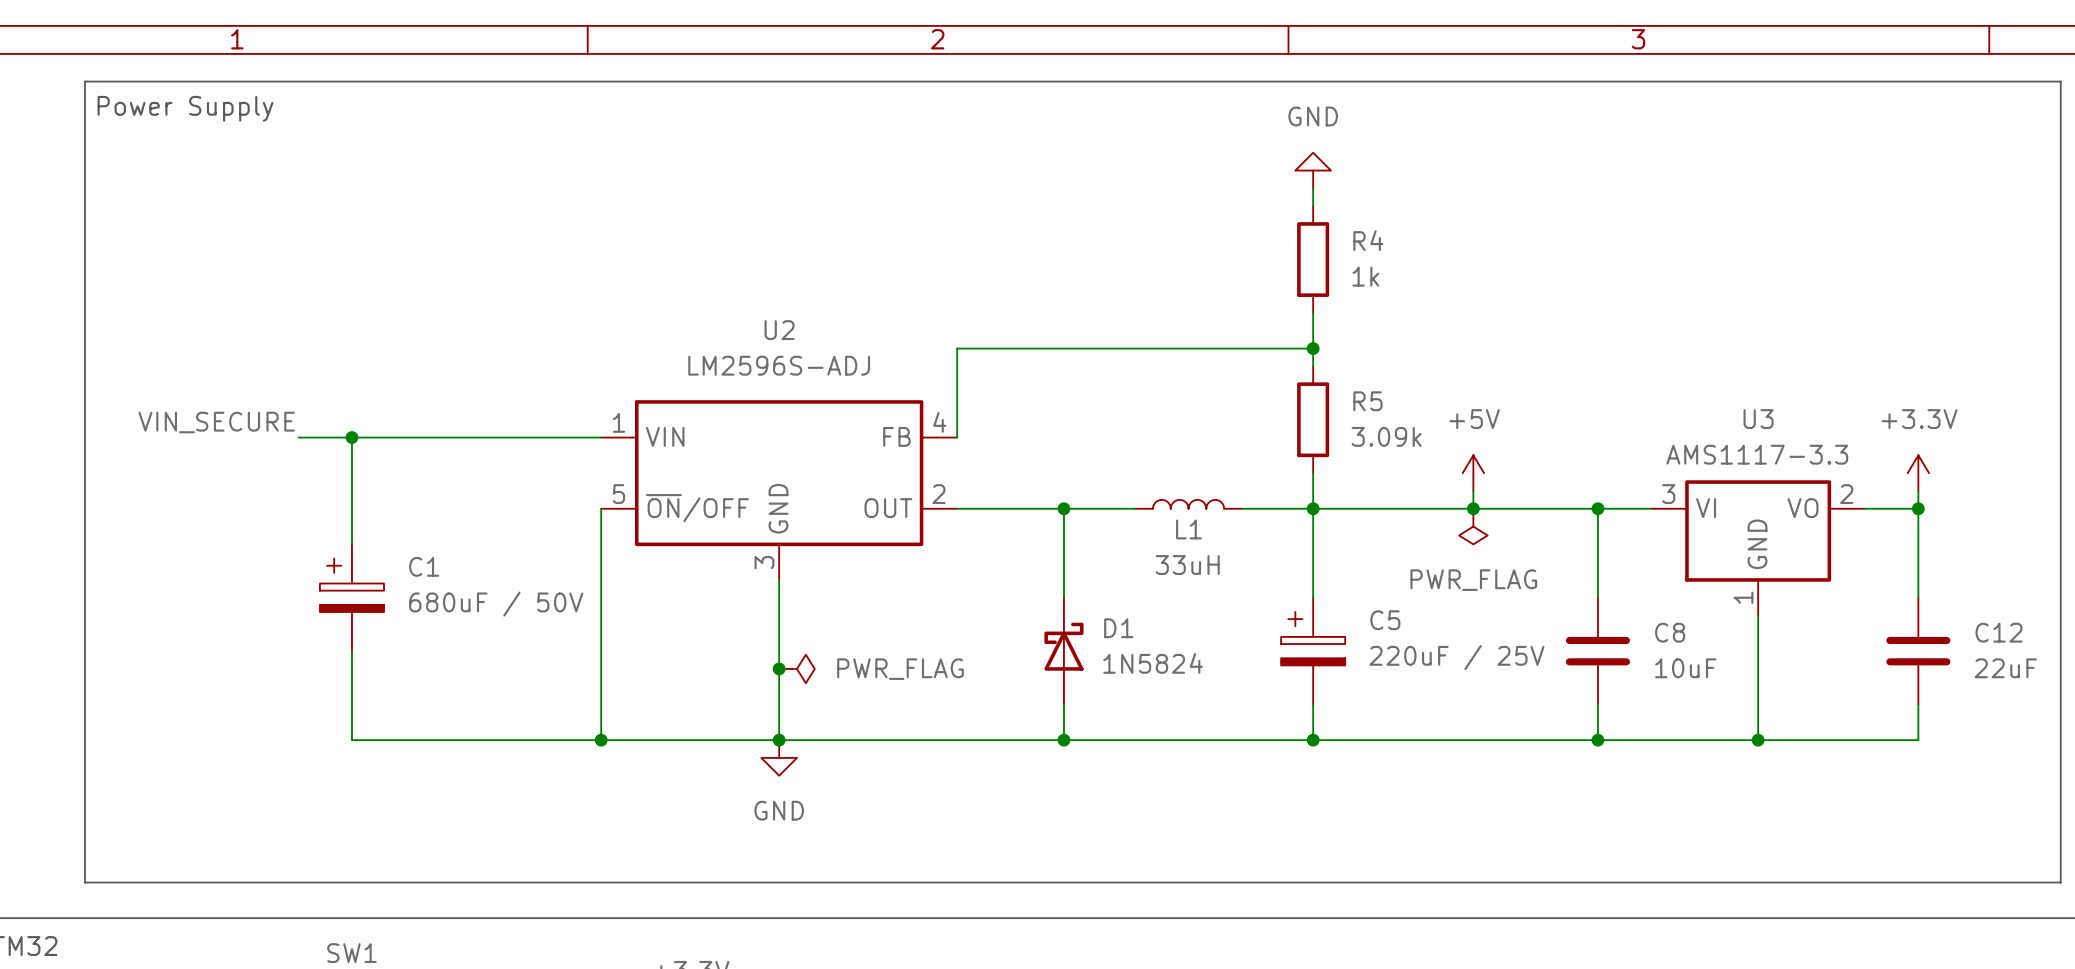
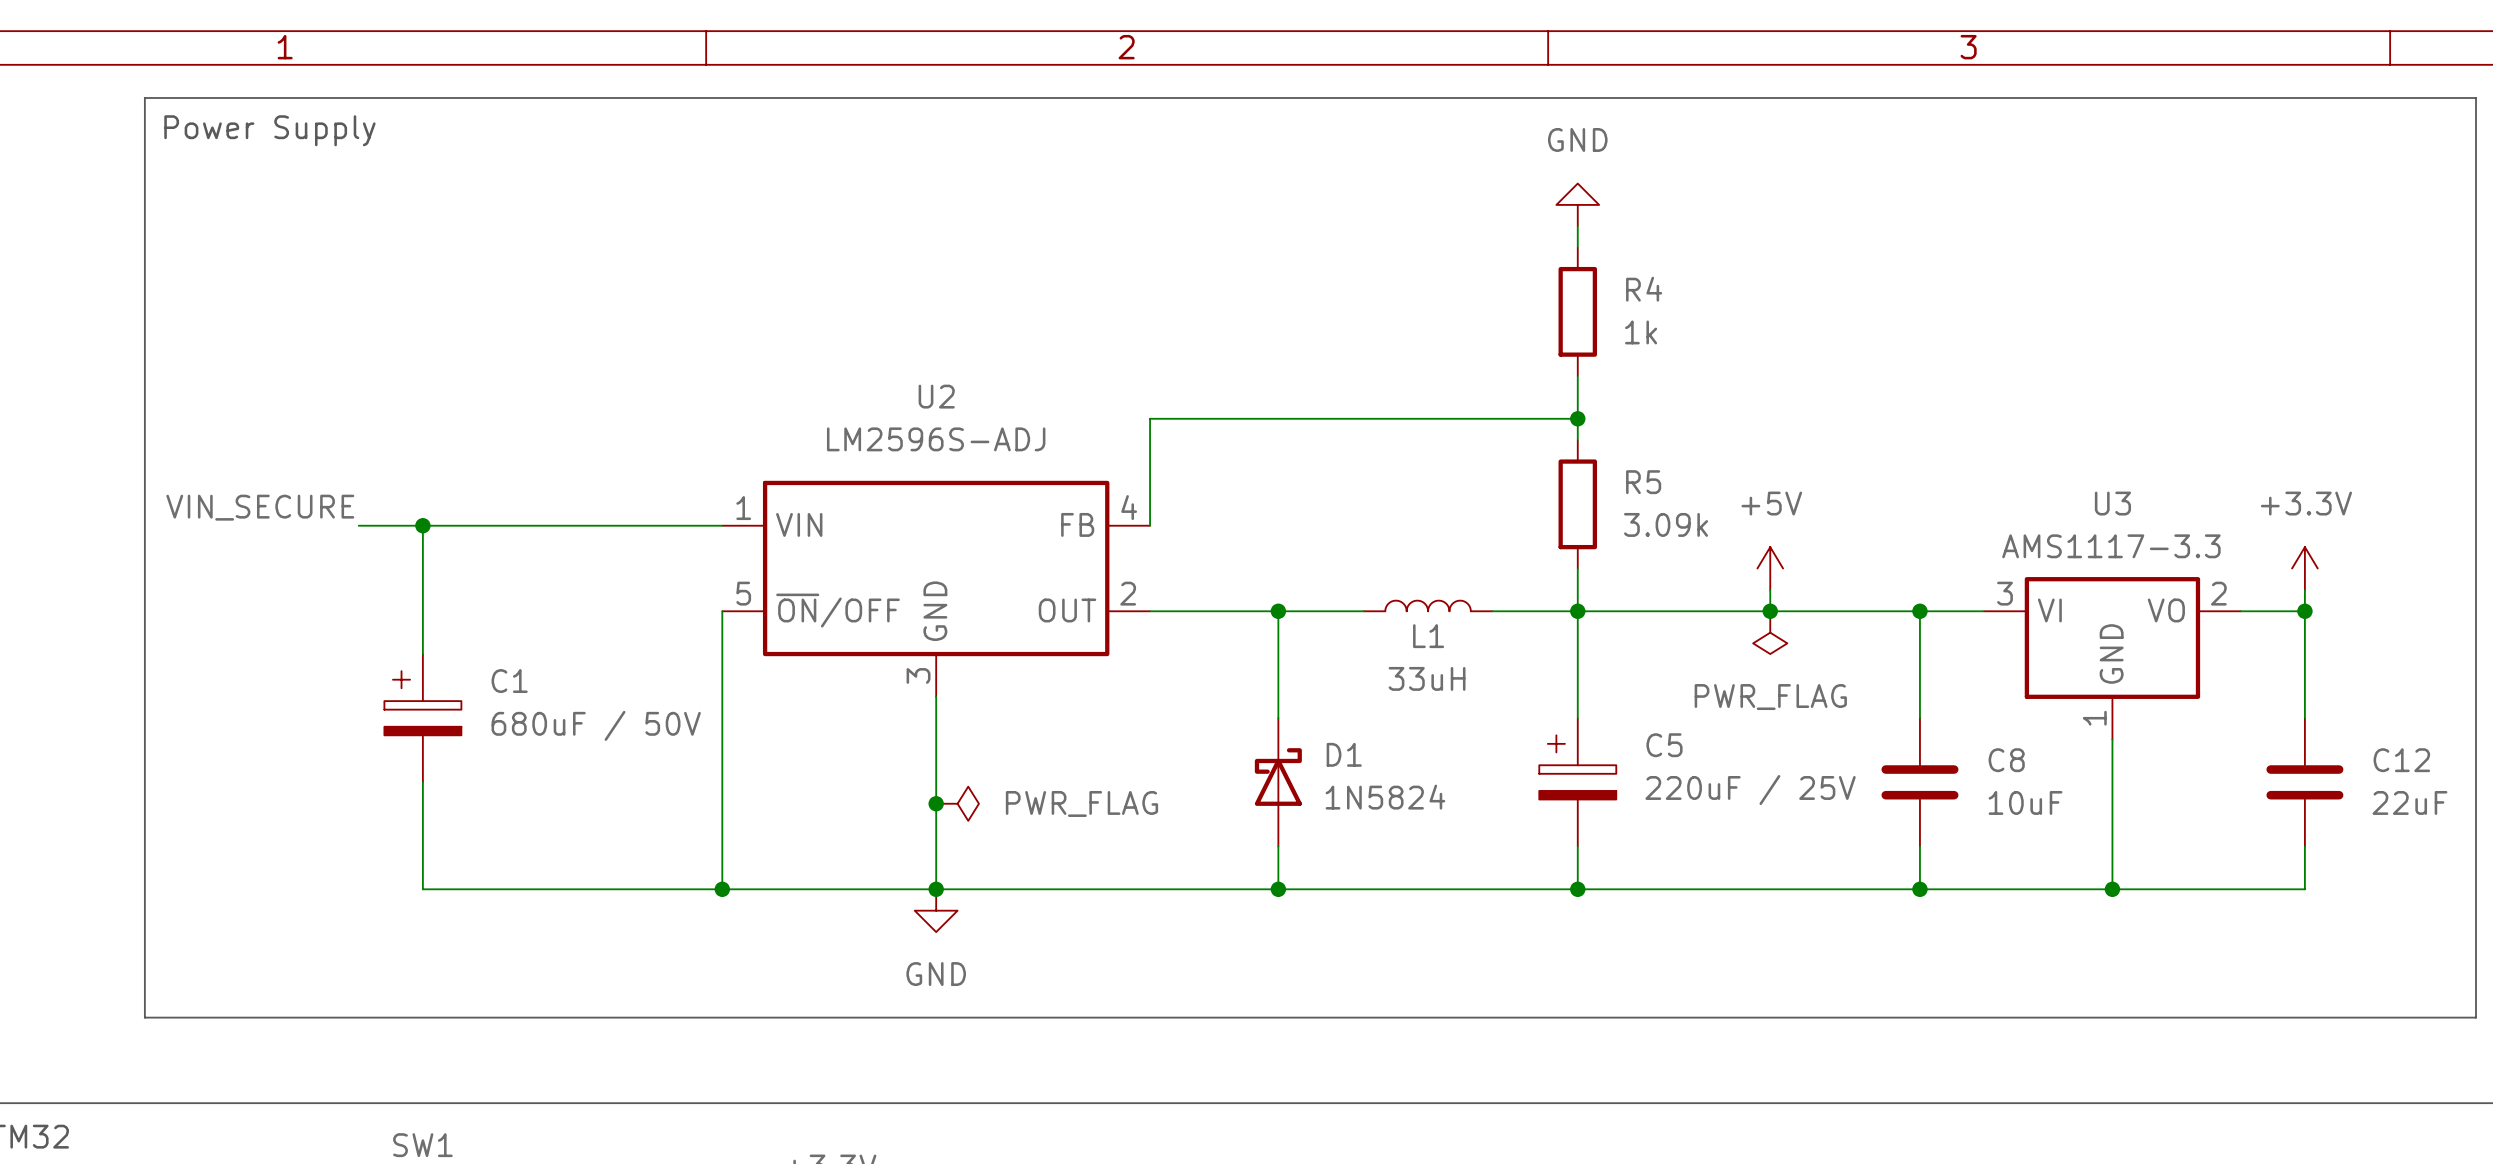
line: (120, 81) (84, 81) (84, 882) (2060, 882) (2060, 846) -> (144, 97) (144, 1017) (2476, 1017)
text position: Power Supply (185, 108) -> Power Supply (269, 130)

